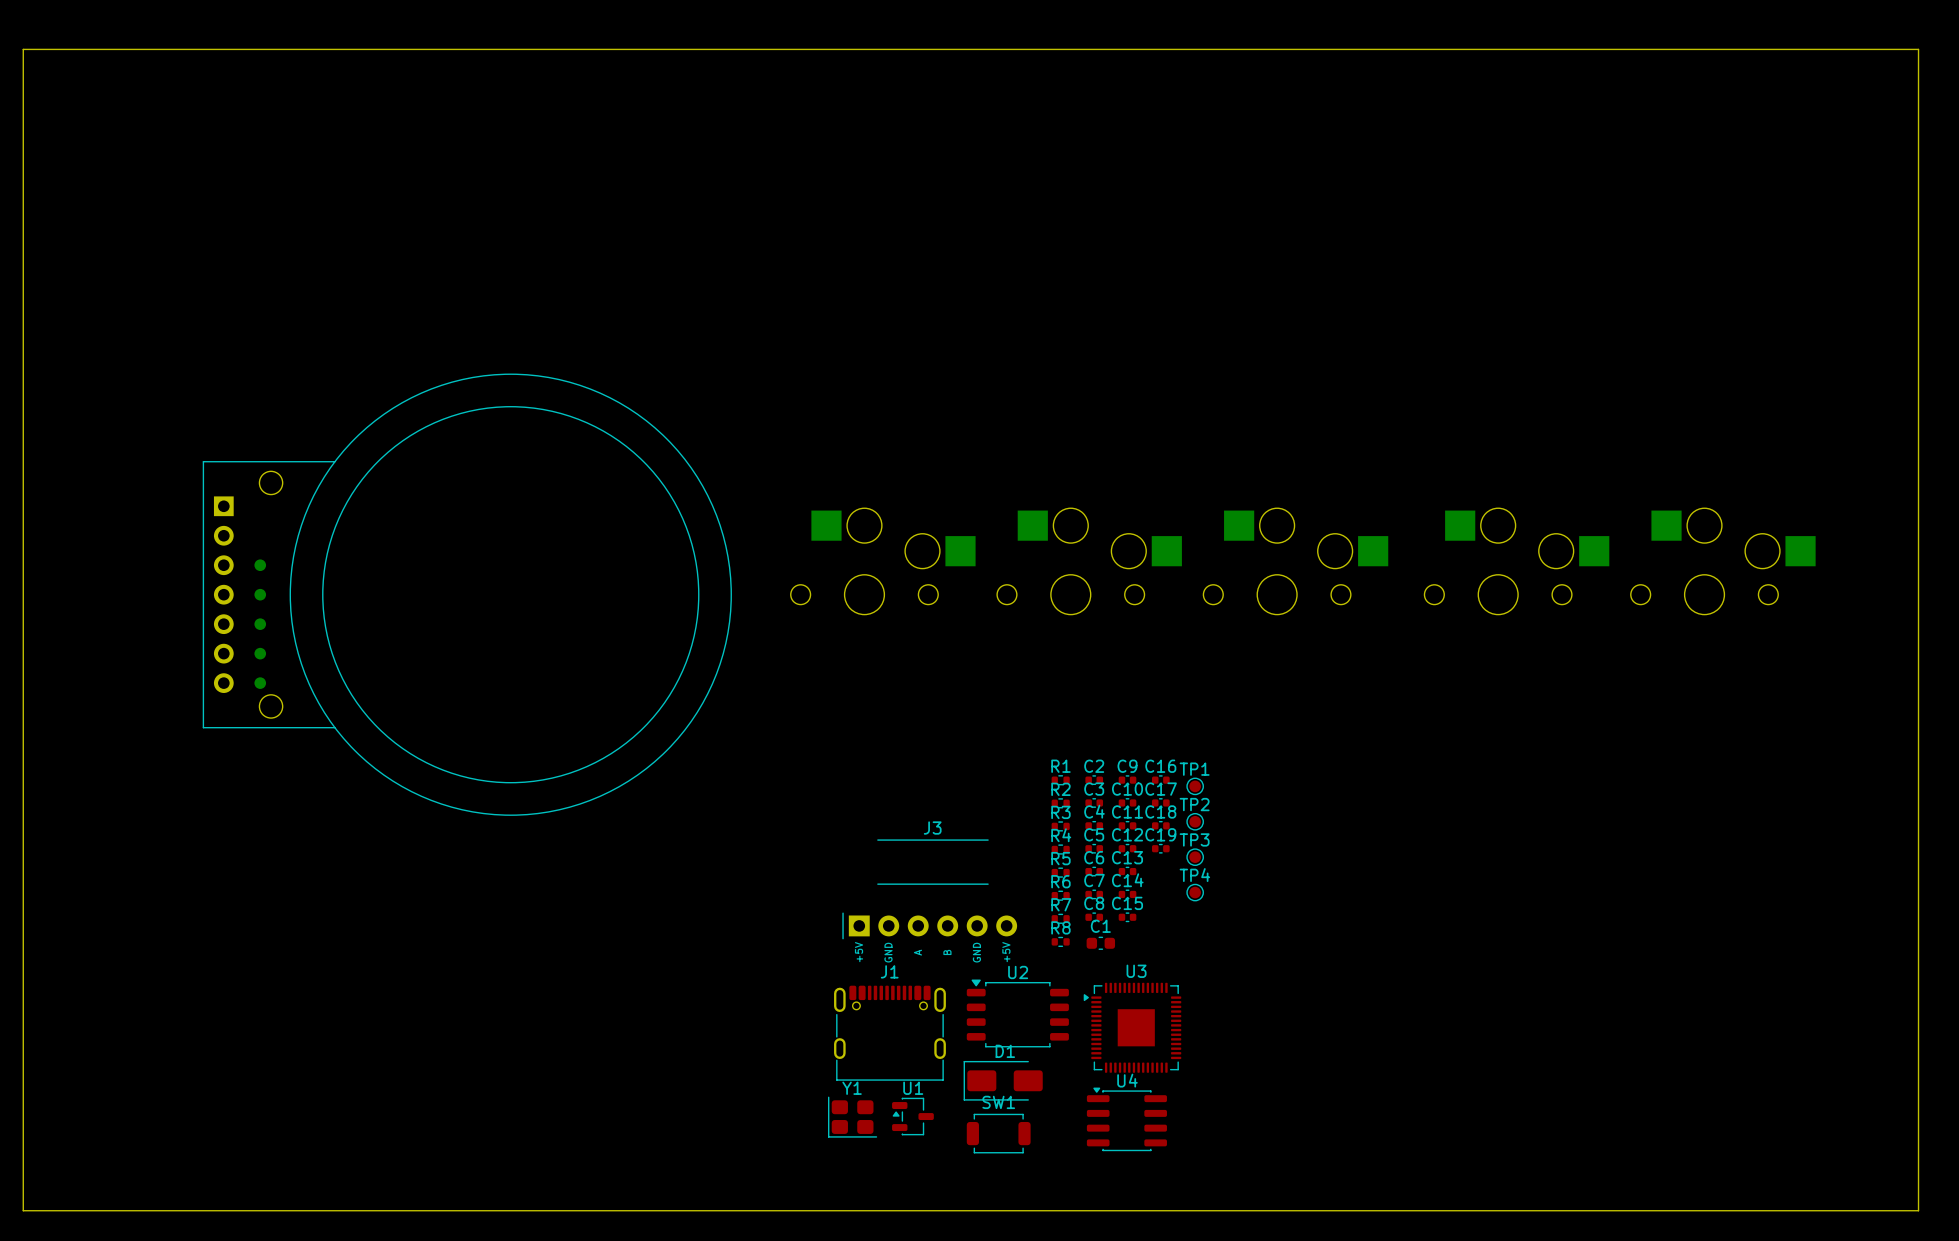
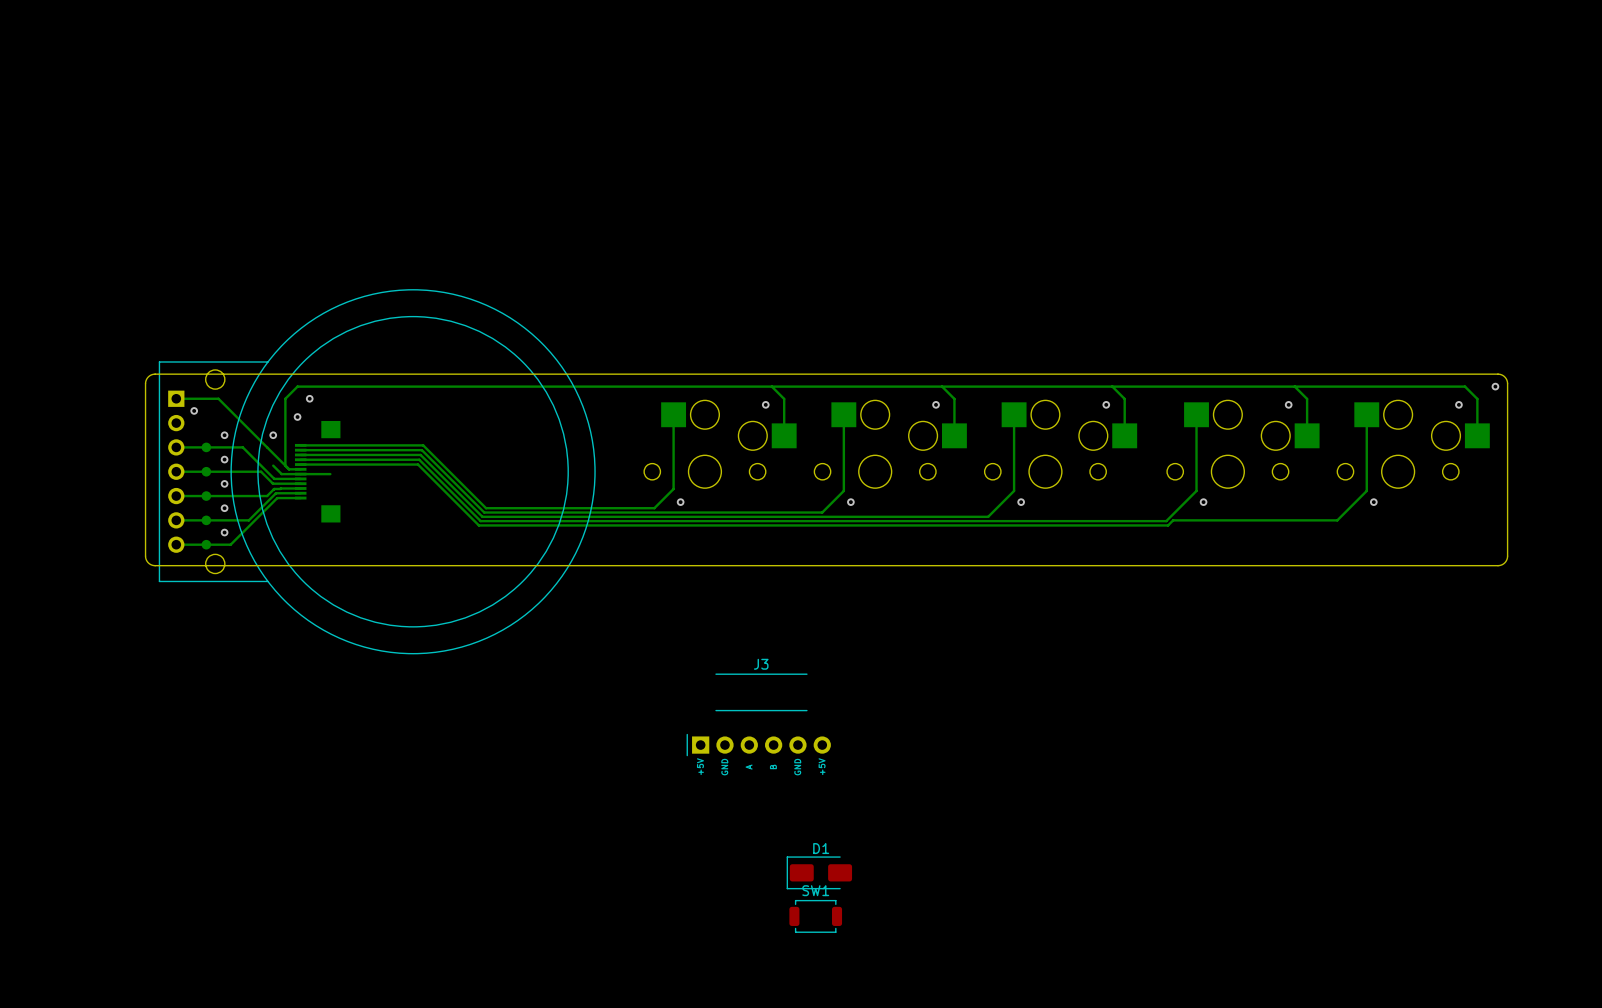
board edge: (23, 49) (1918, 49) (1918, 1210) (23, 1210) (23, 49) -> none
board edge: none -> (155, 374) (1499, 374) (1504, 376) (1507, 383) (1507, 557) (1504, 562) (1498, 565) (154, 565) (148, 562) (145, 556) (145, 383) (148, 376) (155, 374)
bottom track: none -> (771, 386) (784, 398) (784, 435)
bottom track: none -> (942, 386) (954, 398) (954, 435)
bottom track: none -> (1112, 386) (1124, 398) (1124, 435)
bottom track: none -> (1294, 386) (1307, 398) (1307, 435)
via: none -> (1495, 386)
bottom track: none -> (176, 398) (218, 398) (289, 469) (300, 469)
via: none -> (309, 398)
via: none -> (765, 404)
via: none -> (936, 404)
via: none -> (1106, 404)
via: none -> (1288, 404)
via: none -> (1458, 404)
via: none -> (194, 410)
bottom track: none -> (673, 414) (673, 489) (654, 508) (486, 508) (423, 445) (300, 445)
bottom track: none -> (843, 414) (843, 490) (822, 512) (484, 512) (421, 450) (300, 450)
bottom track: none -> (1014, 414) (1014, 490) (988, 516) (482, 516) (420, 454) (300, 454)
bottom track: none -> (1196, 414) (1196, 490) (1166, 521) (480, 521) (419, 459) (300, 459)
bottom track: none -> (1366, 414) (1366, 490) (1337, 520) (1173, 520) (1168, 525) (478, 525) (418, 464) (300, 464)
via: none -> (297, 417)
via: none -> (224, 435)
via: none -> (273, 435)
bottom track: none -> (1477, 435) (1477, 398) (1465, 386) (297, 386) (285, 398) (285, 465)
bottom track: none -> (176, 447) (242, 447) (274, 478) (300, 478)
via: none -> (224, 459)
bottom track: none -> (273, 465) (281, 474) (330, 474)
bottom track: none -> (176, 471) (261, 471) (272, 483)
part: none -> (317, 471)
bottom track: none -> (272, 483) (300, 483)
via: none -> (224, 483)
bottom track: none -> (300, 488) (274, 488) (267, 496) (176, 496)
bottom track: none -> (300, 493) (276, 493) (248, 520) (176, 520)
bottom track: none -> (300, 498) (277, 498) (230, 544) (176, 544)
via: none -> (680, 502)
via: none -> (850, 502)
via: none -> (1021, 502)
via: none -> (1203, 502)
via: none -> (1373, 502)
via: none -> (224, 508)
via: none -> (224, 532)
R1: (1060, 780) -> none
C2: (1094, 780) -> none
C9: (1127, 780) -> none
C16: (1160, 780) -> none
TP1: (1195, 786) -> none
C3: (1094, 802) -> none
C10: (1127, 802) -> none
C17: (1160, 802) -> none
R2: (1060, 803) -> none
TP2: (1195, 821) -> none
C4: (1094, 825) -> none
C11: (1127, 825) -> none
C18: (1160, 825) -> none
R3: (1060, 826) -> none
C5: (1094, 848) -> none
C12: (1127, 848) -> none
C19: (1160, 848) -> none
R4: (1060, 849) -> none
TP3: (1195, 857) -> none
C6: (1094, 871) -> none
C13: (1127, 871) -> none
R5: (1060, 872) -> none
TP4: (1195, 892) -> none
C7: (1094, 894) -> none
C14: (1127, 894) -> none
R6: (1060, 895) -> none
C8: (1094, 917) -> none
C15: (1127, 917) -> none
R7: (1060, 918) -> none
R8: (1060, 941) -> none
C1: (1100, 943) -> none
U2: (1017, 1013) -> none
U3: (1132, 1027) -> none
J1: (889, 1033) -> none
U1: (912, 1116) -> none
Y1: (852, 1117) -> none
U4: (1126, 1119) -> none

